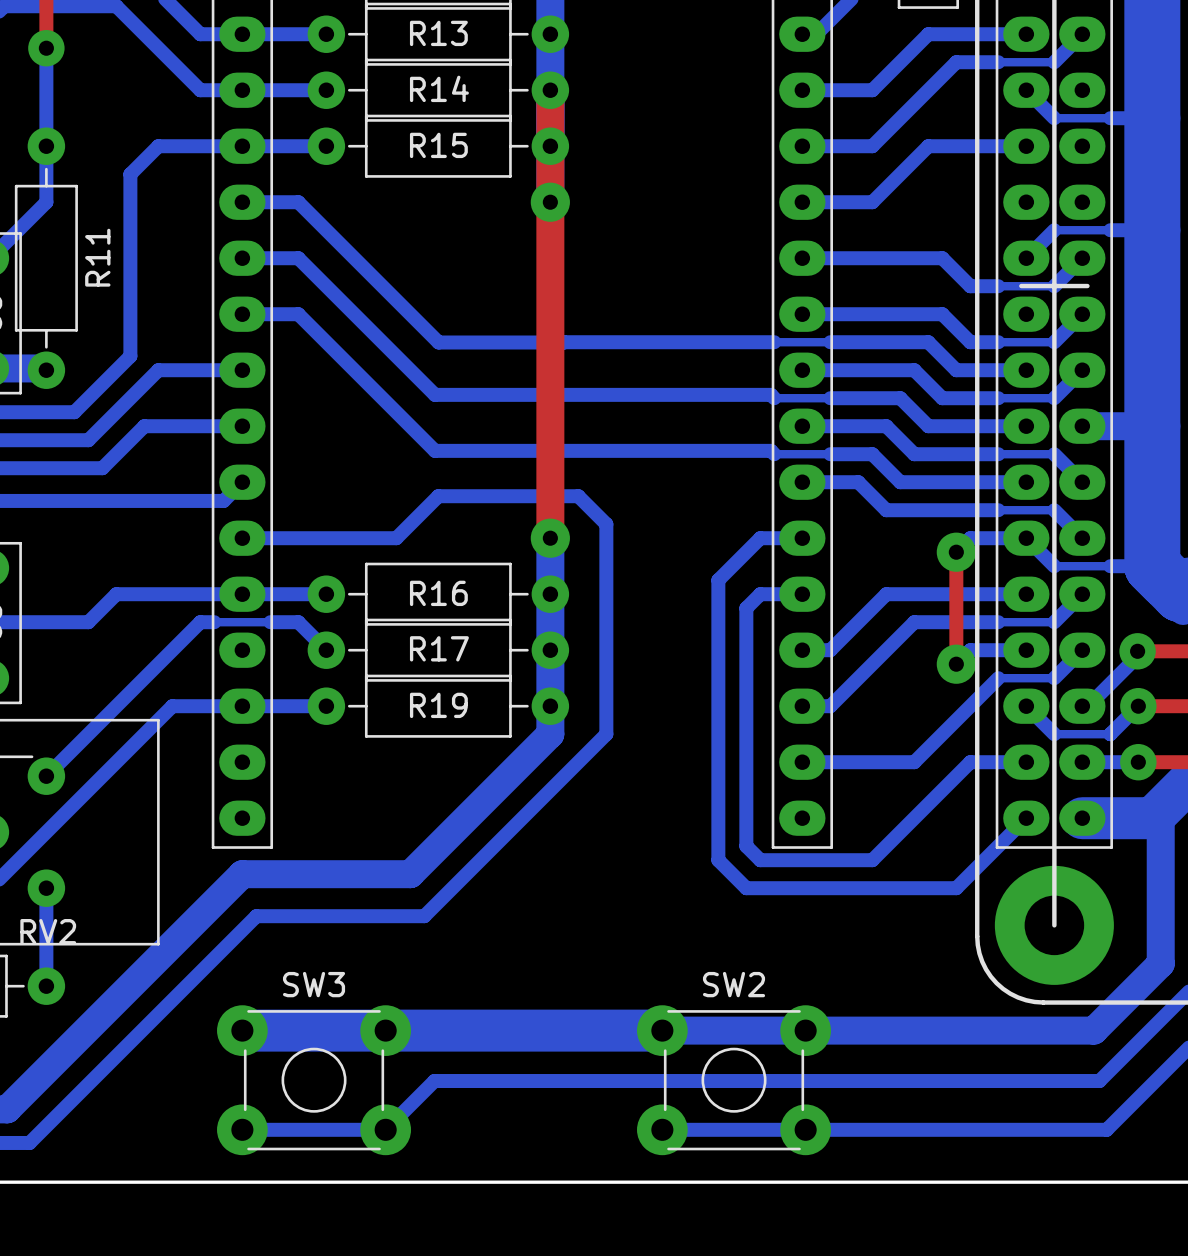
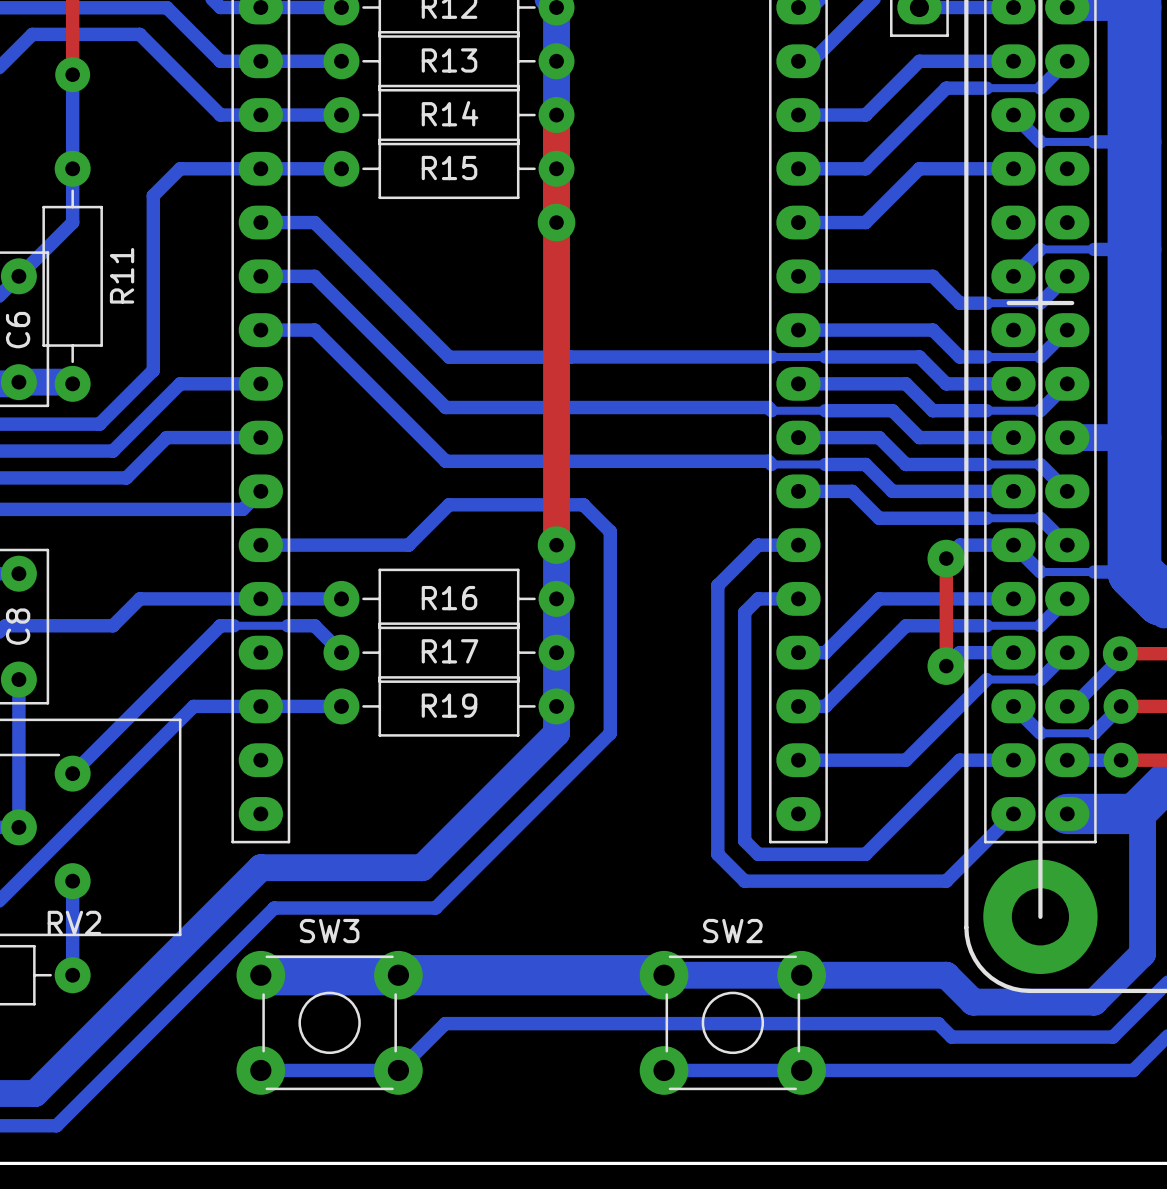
bottom track: (1110, 1014) (1093, 1030) (242, 1030) -> (1094, 1002) (973, 1002) (946, 975) (260, 975)
bottom track: (1129, 1050) (1099, 1081) (434, 1081) (385, 1129) (242, 1129) -> (1112, 1037) (951, 1037) (938, 1023) (445, 1023) (398, 1070) (260, 1070)
SW3 position: (314, 1080) -> (329, 1022)
SW2 position: (734, 1080) -> (732, 1022)
bottom track: (1151, 1085) (1106, 1129) (662, 1129) -> (1133, 1070) (664, 1070)

